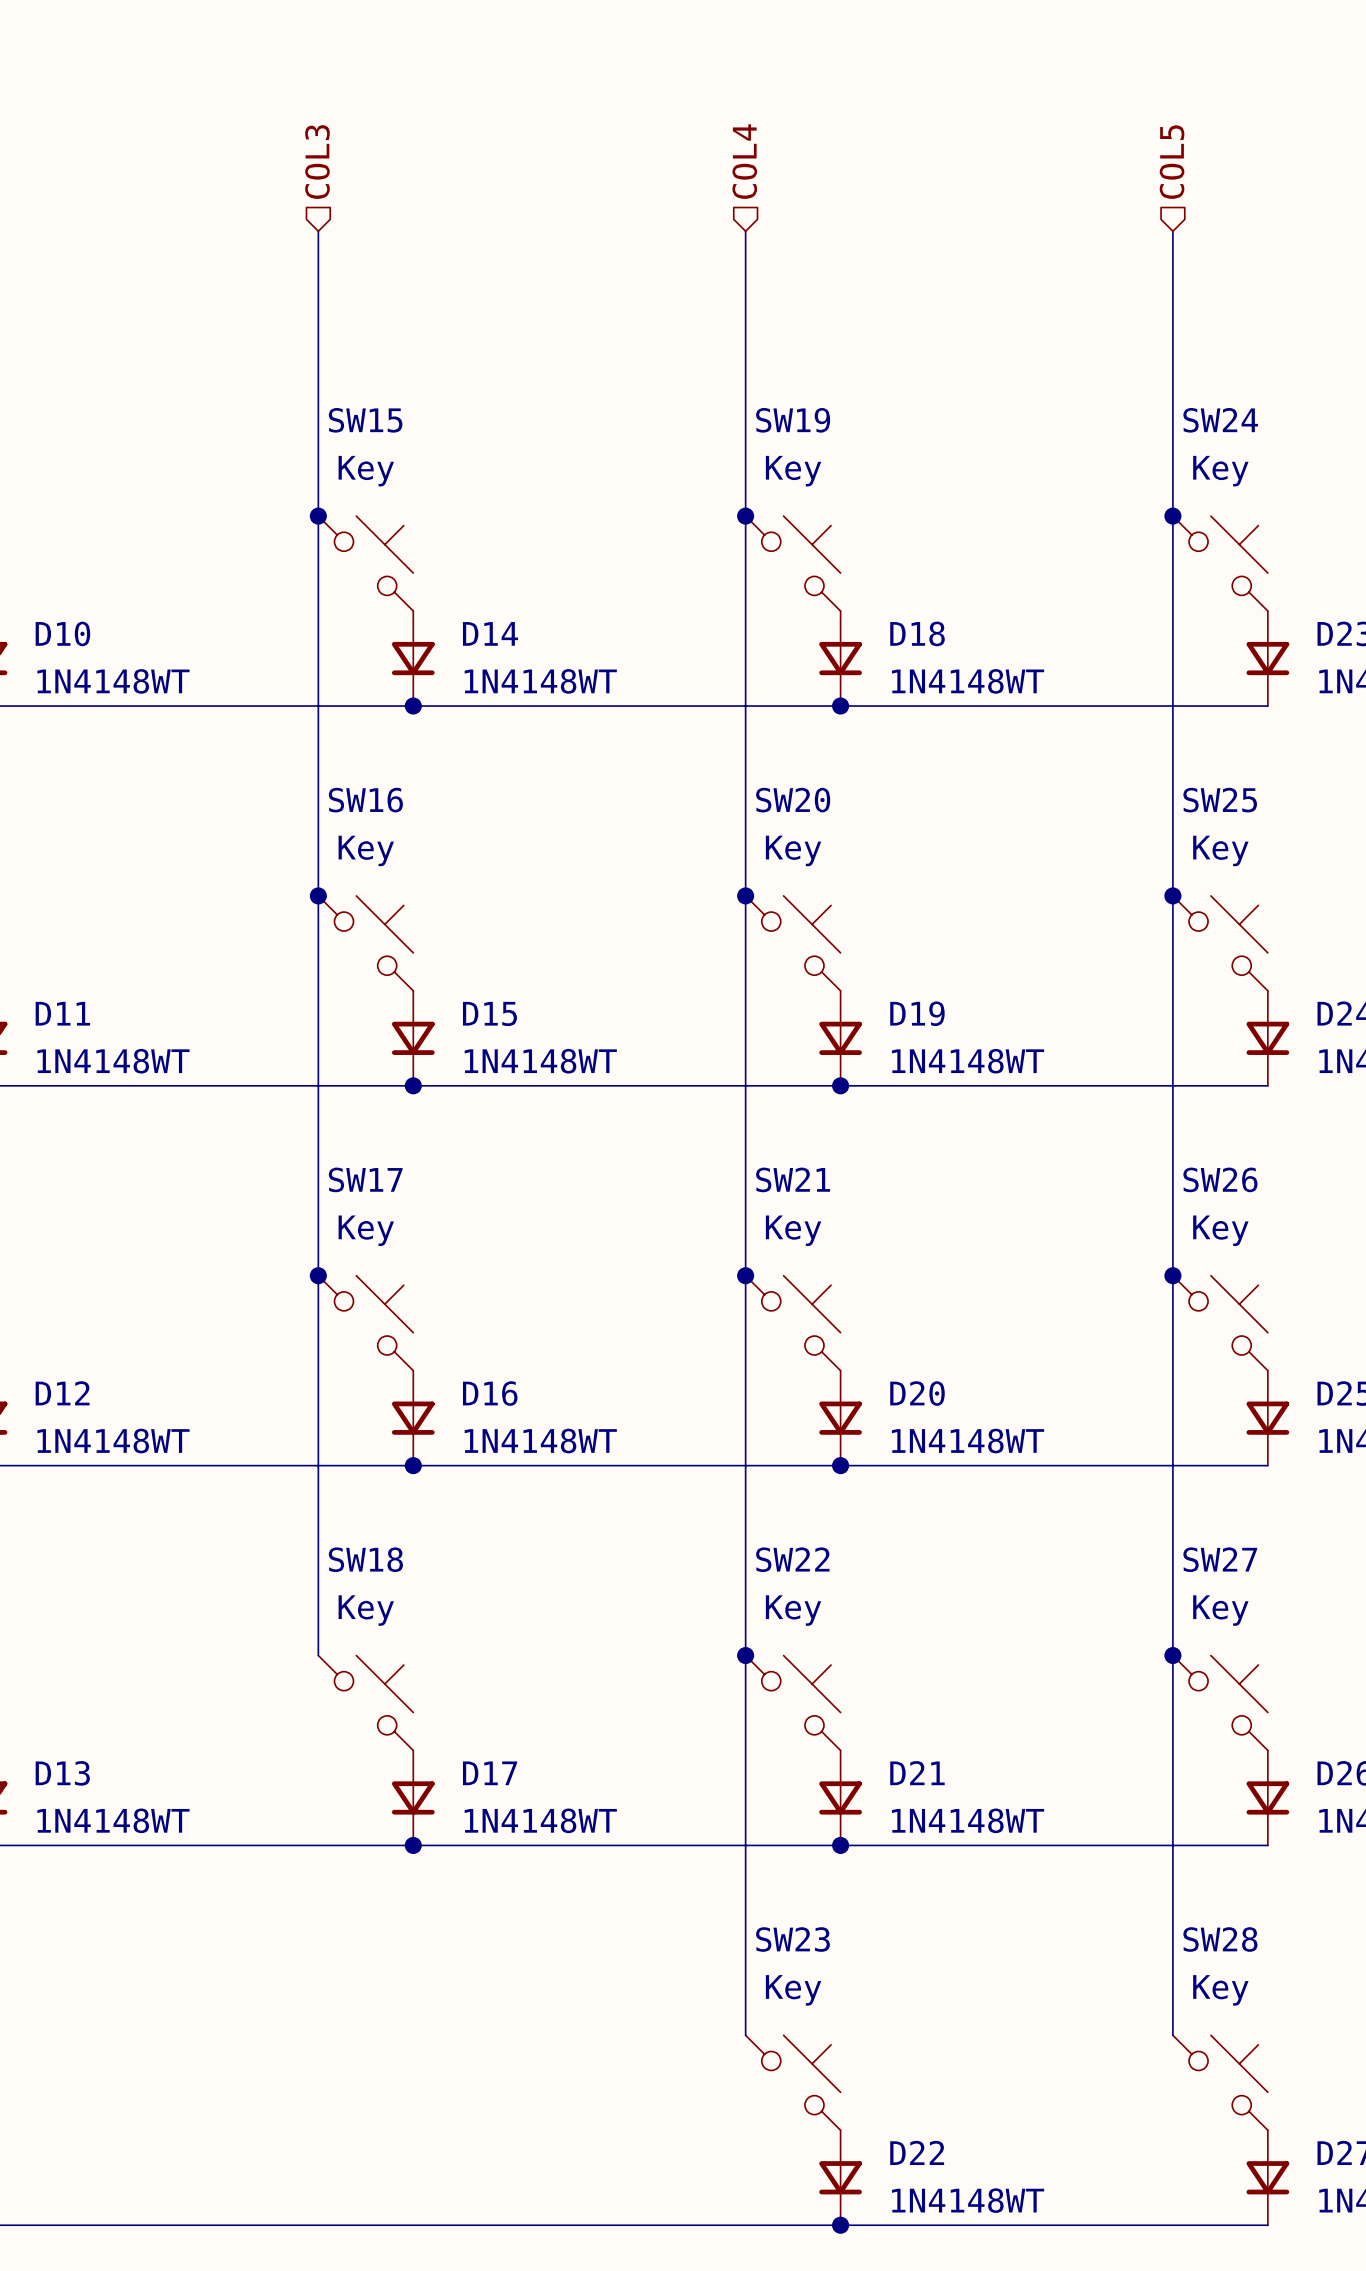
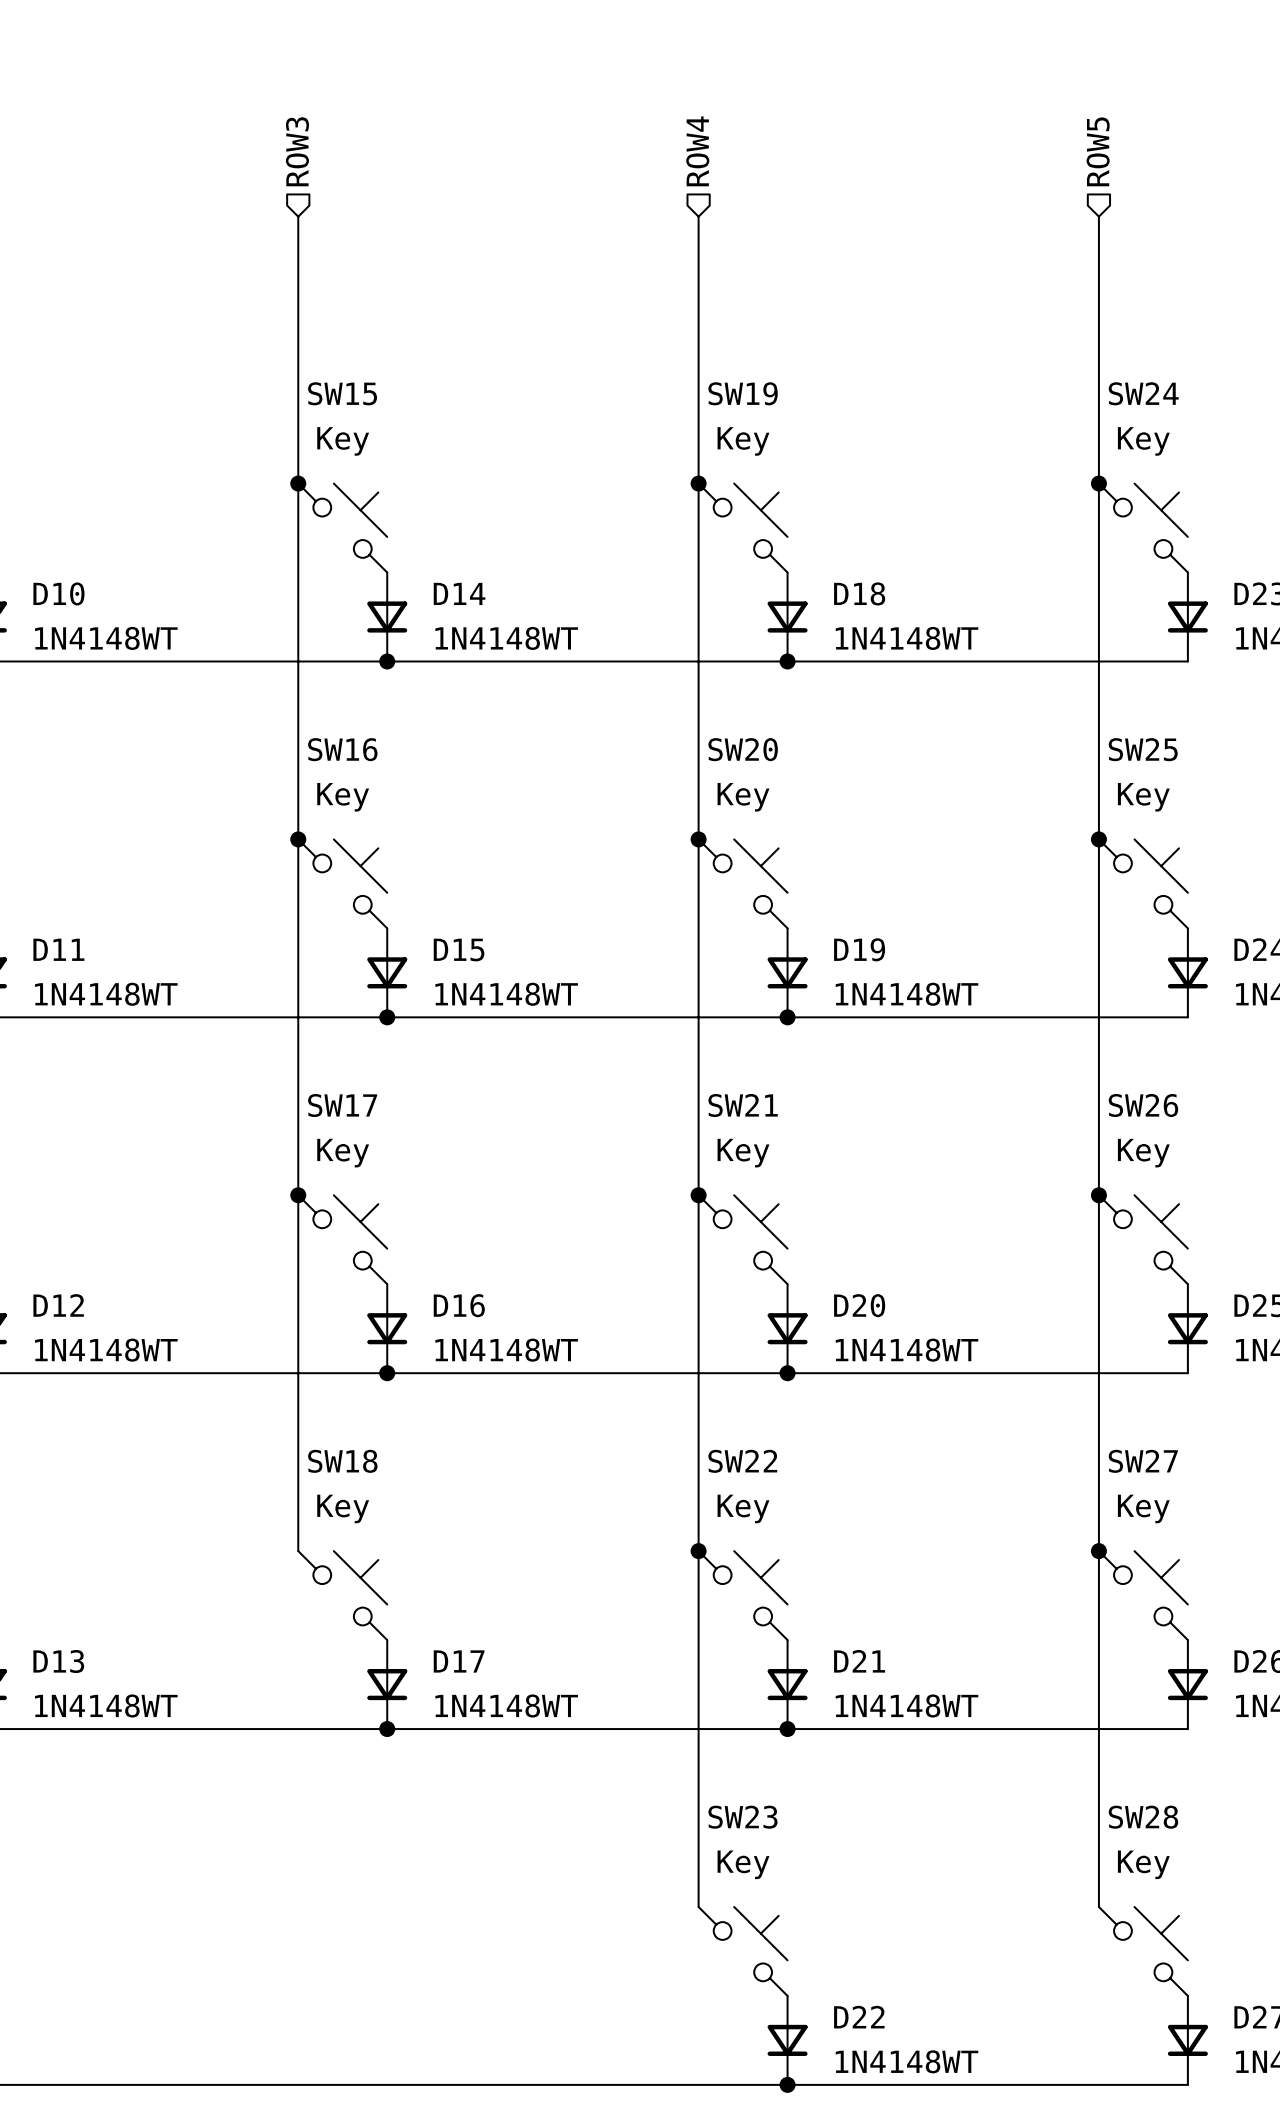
hierarchical label: COL4 (744, 161) -> ROW4 (697, 151)
hierarchical label: COL3 (317, 162) -> ROW3 (297, 151)
hierarchical label: COL5 (1172, 162) -> ROW5 (1098, 151)

